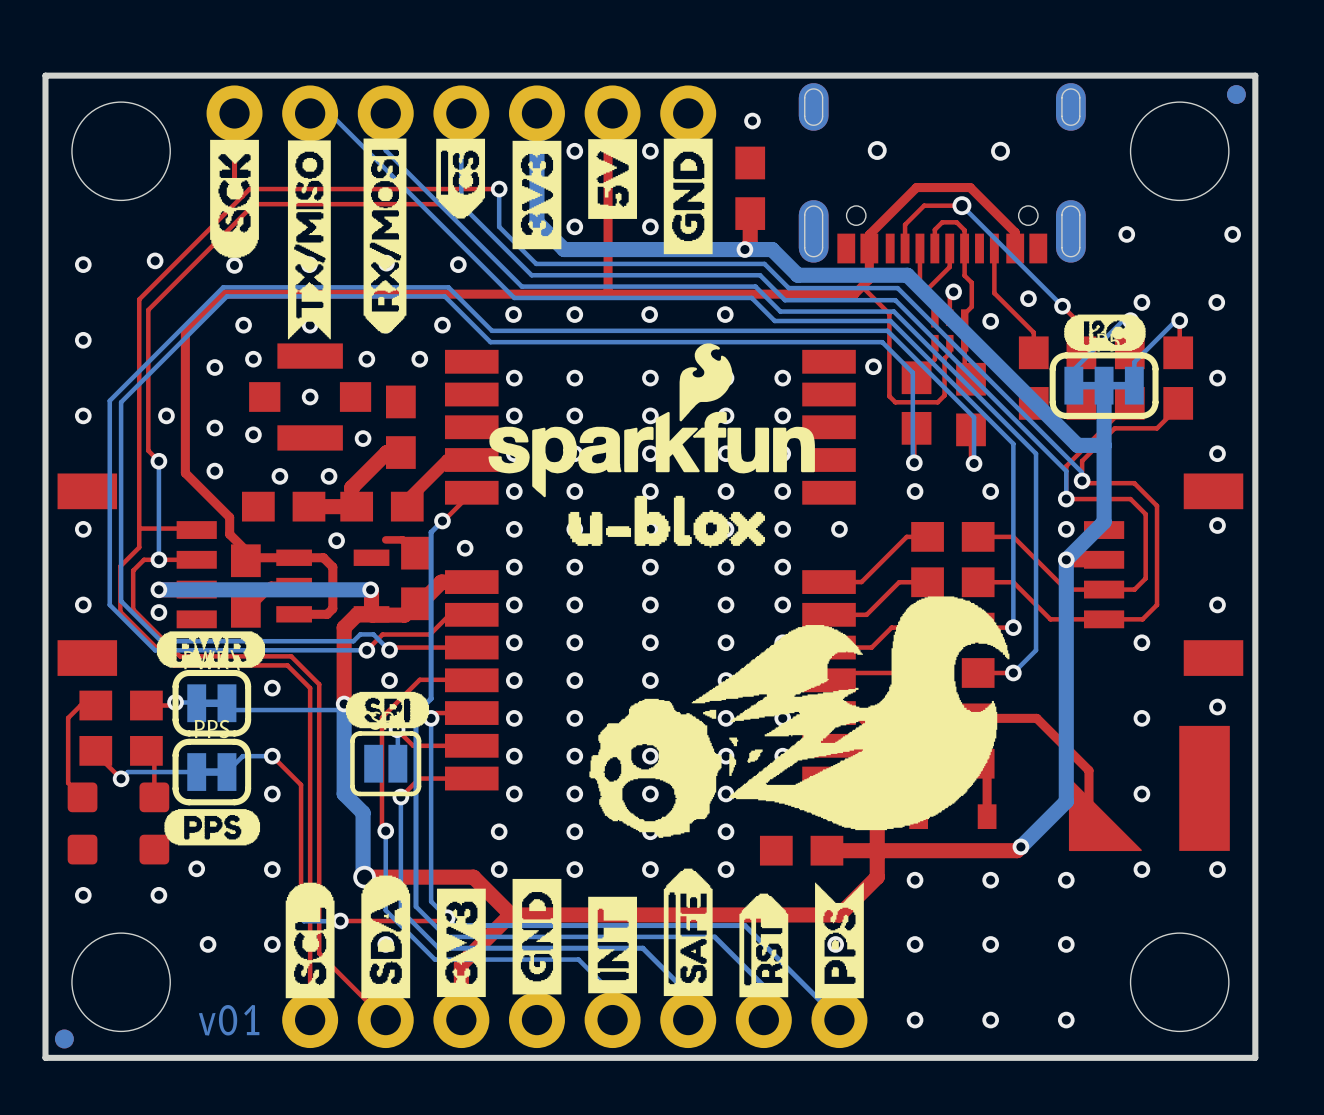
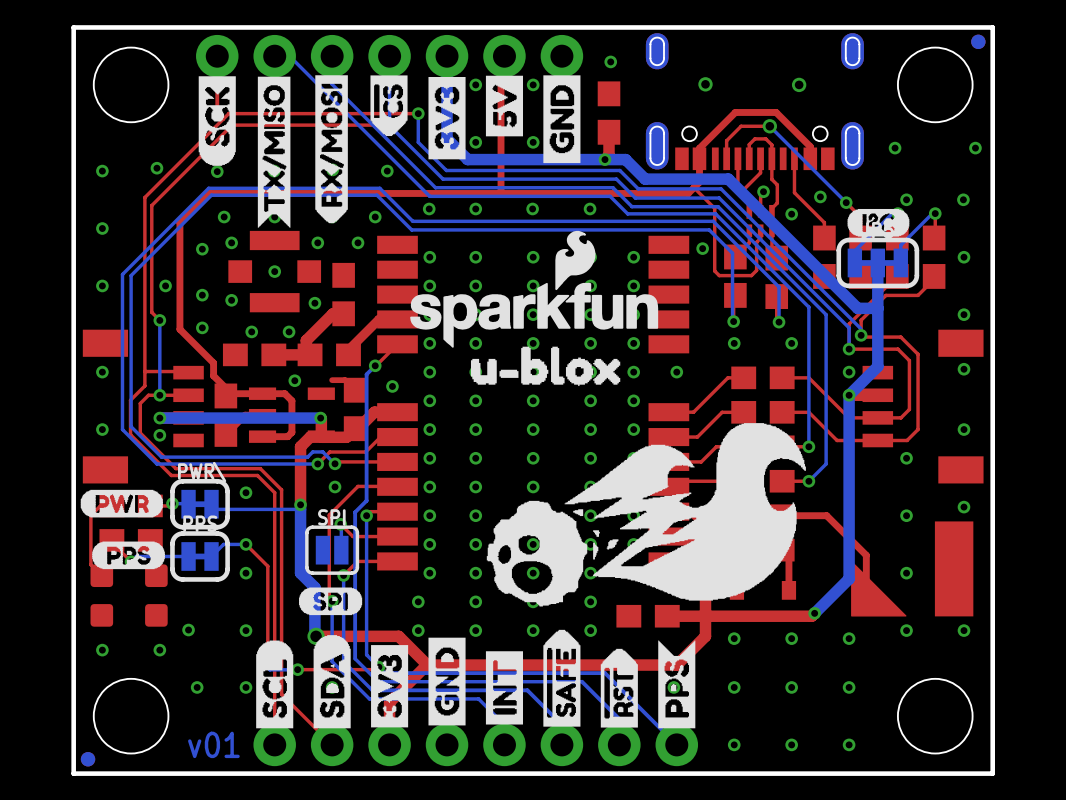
drawing position: (210, 649) -> (121, 503)
drawing position: (387, 710) -> (330, 601)
drawing position: (212, 827) -> (128, 555)

